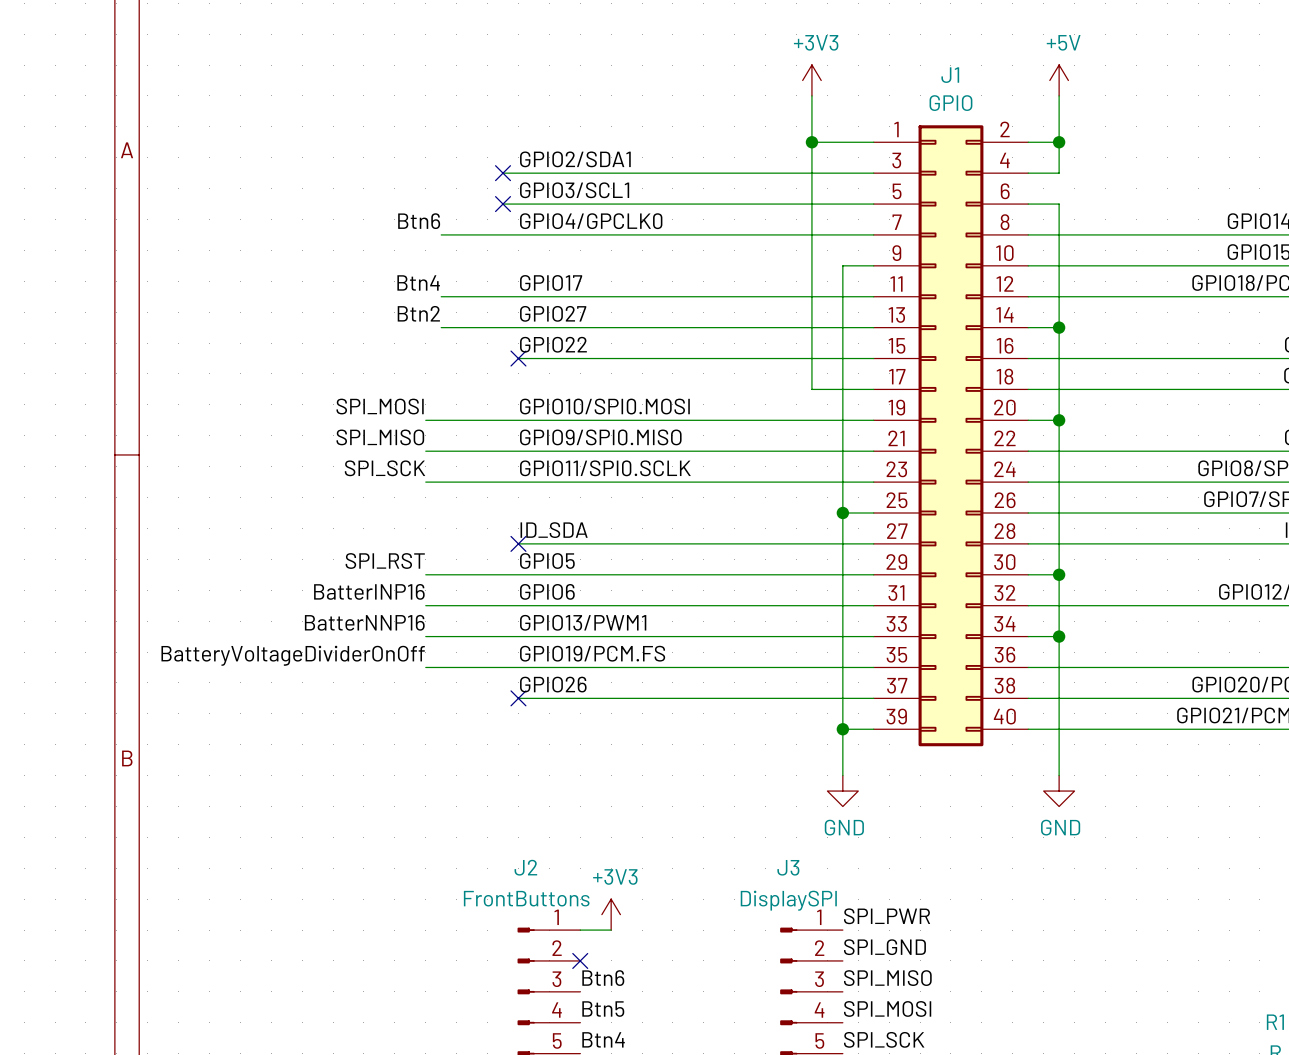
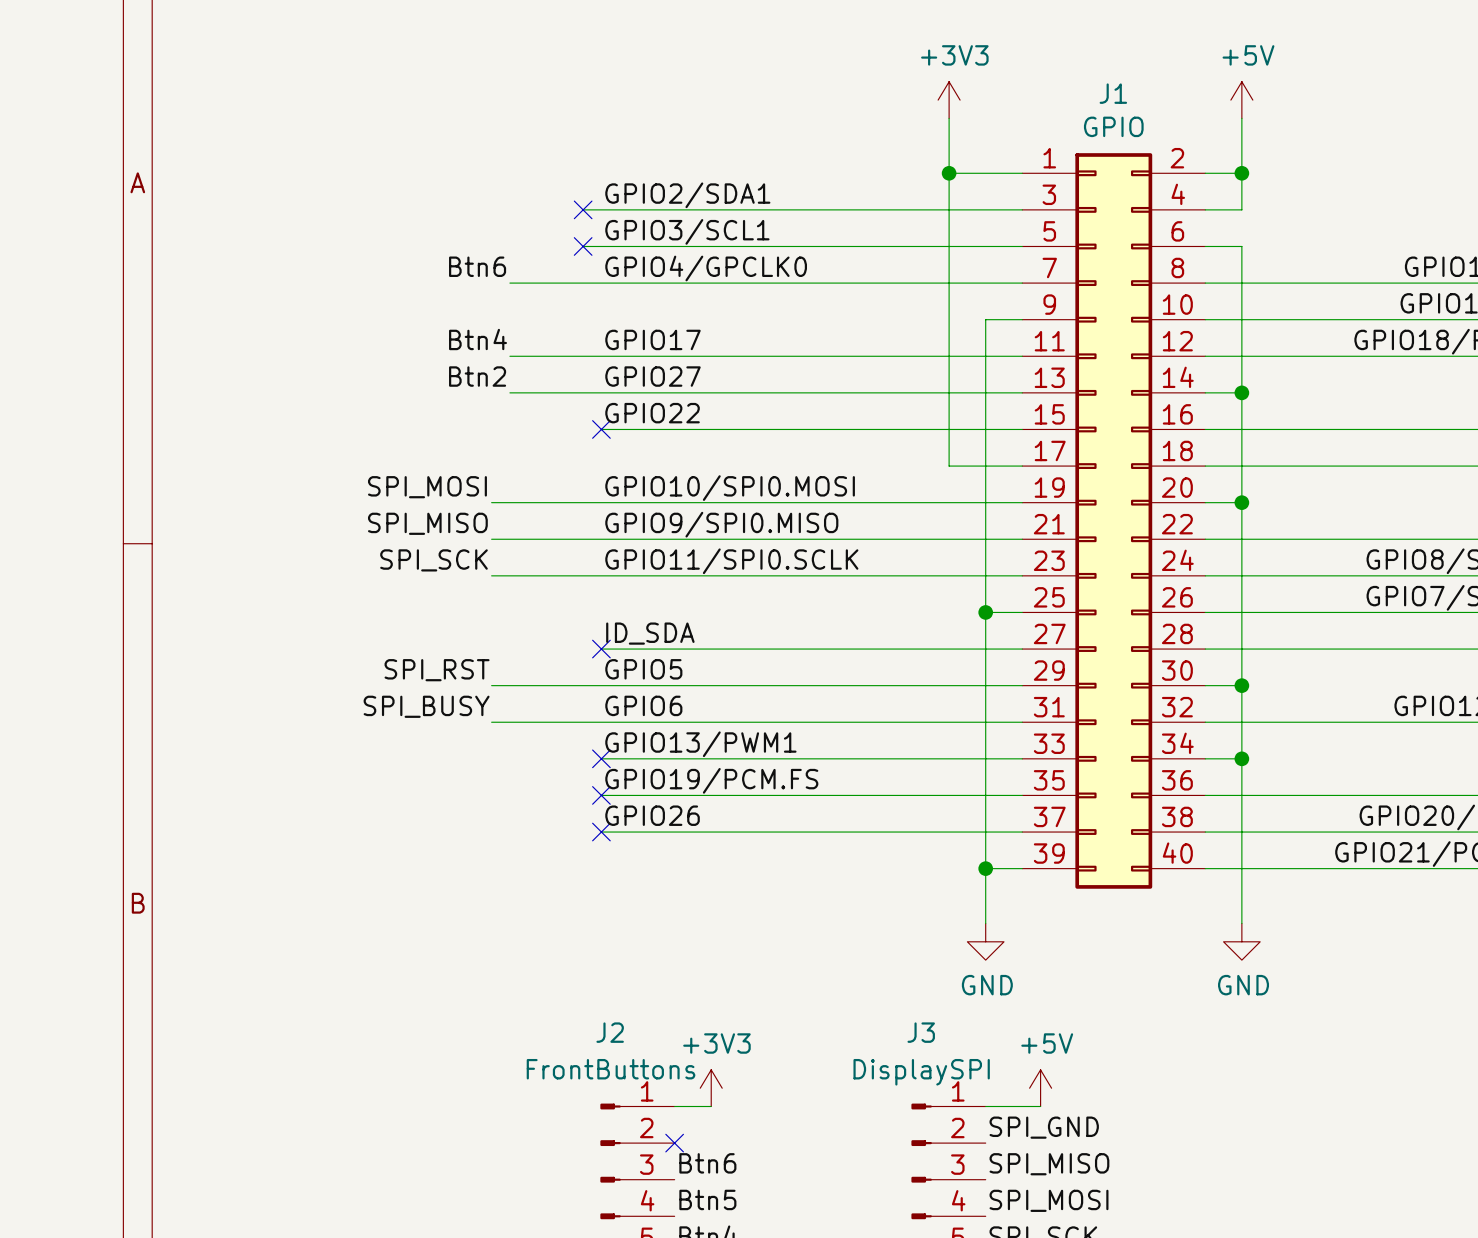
label: BatterINP16 (369, 591) -> SPI_BUSY (426, 706)
label: BatterNNP16 (364, 622) -> none
wire: (425, 636) (518, 636) -> none
no-connect mark: none -> (601, 758)
label: BatteryVoltageDividerOnOff (293, 655) -> none
wire: (425, 667) (518, 667) -> none
no-connect mark: none -> (601, 795)
power symbol: none -> +5V (1040, 1088)
label: SPI_PWR (887, 916) -> none
wire: none -> (985, 1106) (1040, 1106)

